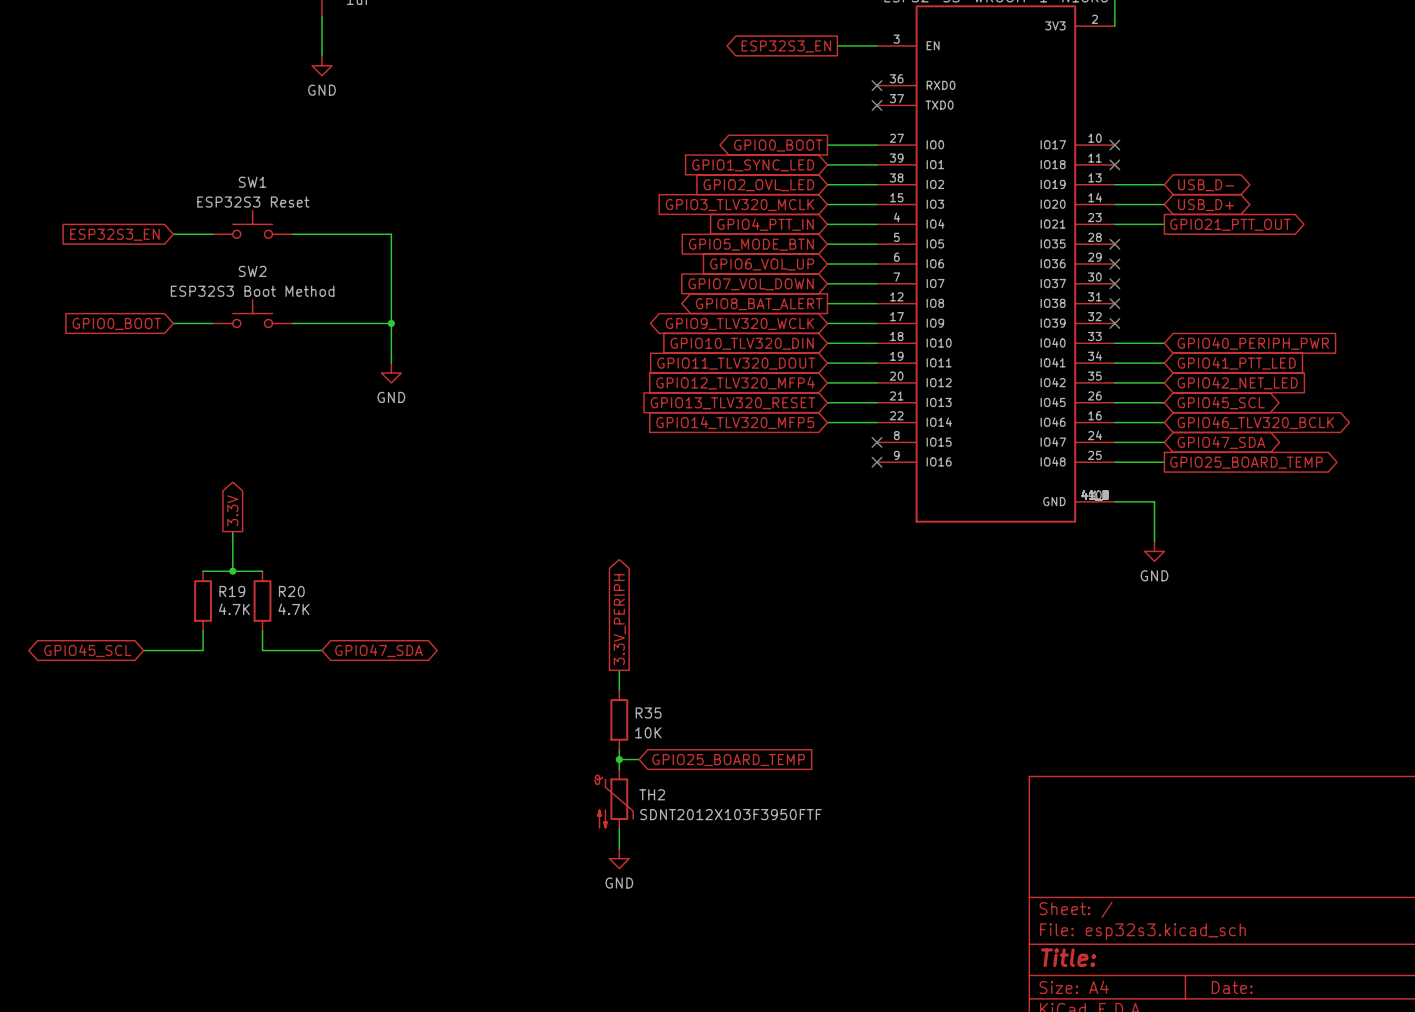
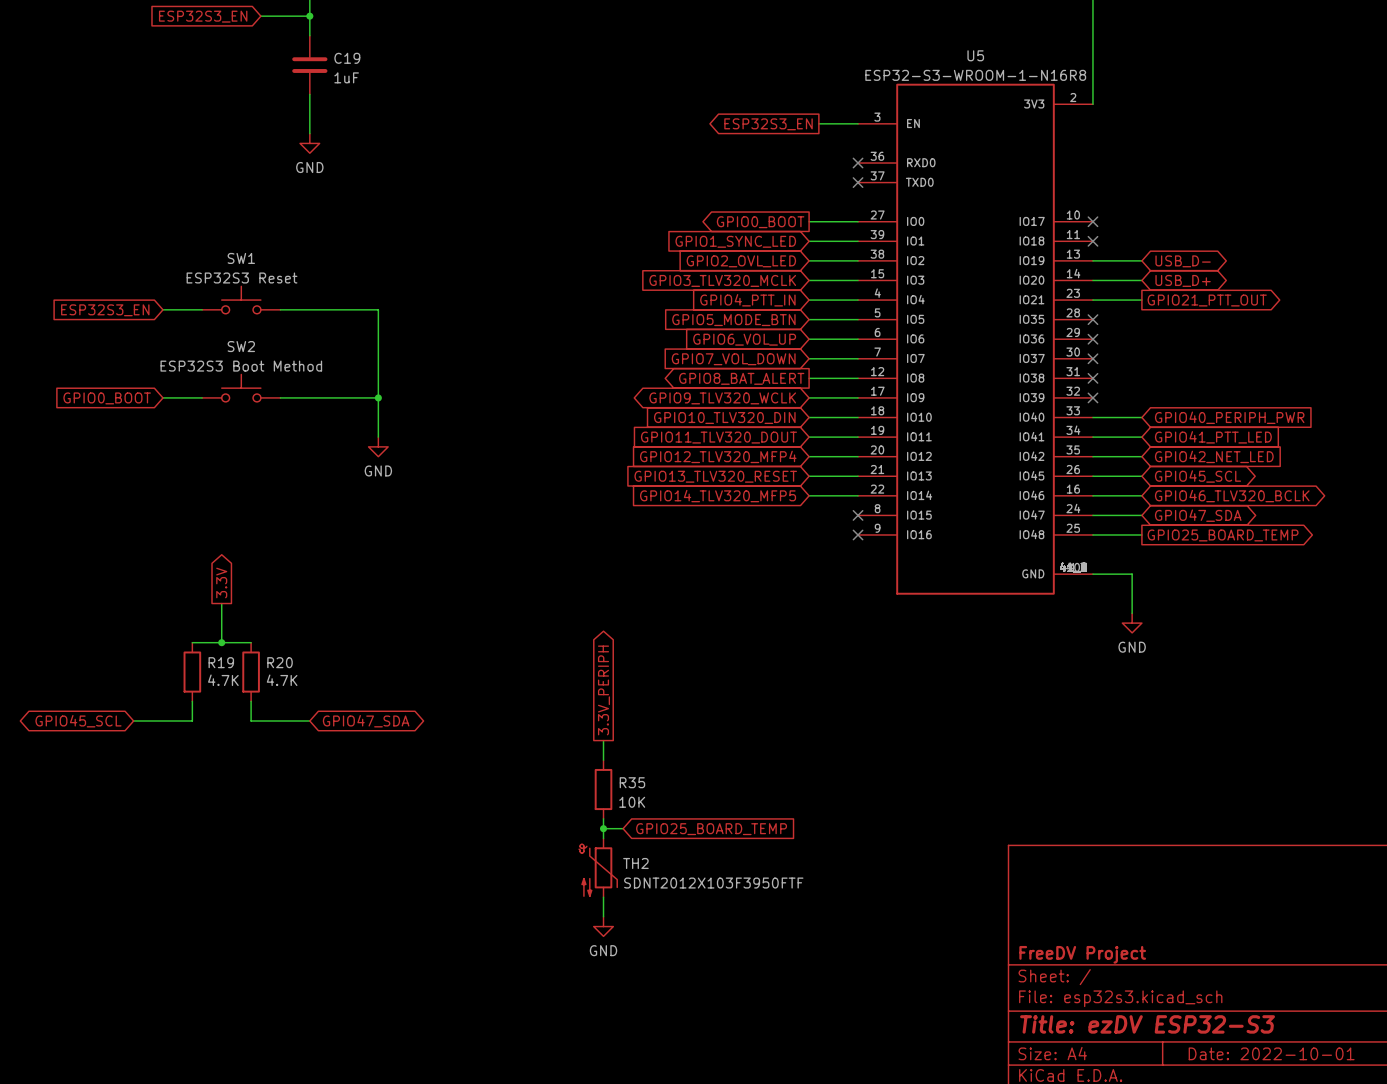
title block: none -> FreeDV Project (1082, 954)
title block: Title: (1068, 957) -> Title: ezDV ESP32-S3 (1147, 1024)
title block: Date: (1232, 987) -> Date: 2022-10-01 (1271, 1053)

